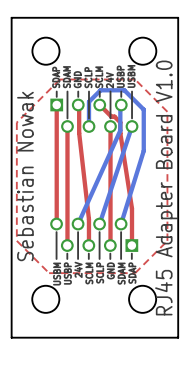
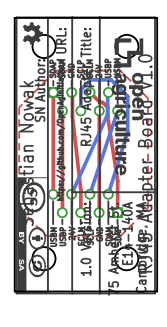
drawing: none -> [15, 16, 156, 294]

